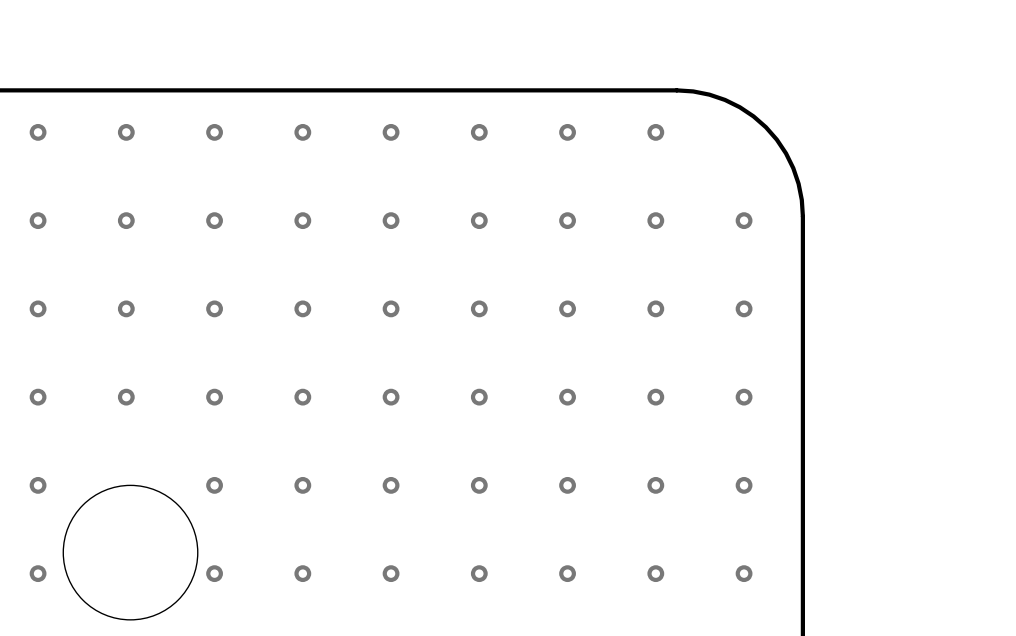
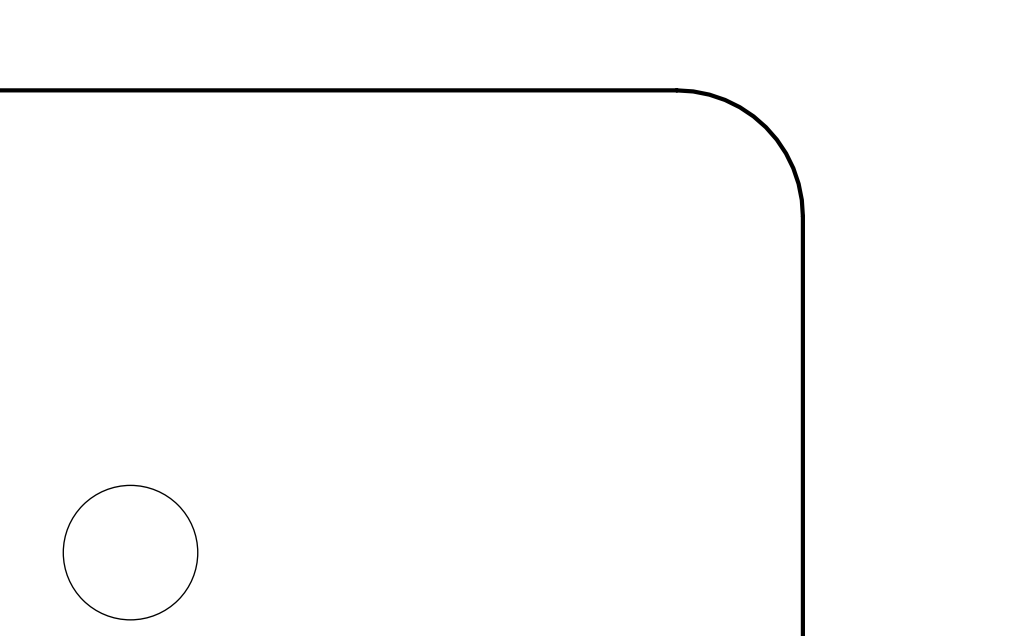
via: (38, 132) -> none
via: (126, 132) -> none
via: (214, 132) -> none
via: (302, 132) -> none
via: (391, 132) -> none
via: (479, 132) -> none
via: (567, 132) -> none
via: (655, 132) -> none
via: (38, 220) -> none
via: (126, 220) -> none
via: (214, 220) -> none
via: (302, 220) -> none
via: (391, 220) -> none
via: (479, 220) -> none
via: (567, 220) -> none
via: (655, 220) -> none
via: (744, 220) -> none
via: (38, 308) -> none
via: (126, 308) -> none
via: (214, 308) -> none
via: (302, 308) -> none
via: (391, 308) -> none
via: (479, 308) -> none
via: (567, 308) -> none
via: (655, 308) -> none
via: (744, 308) -> none
via: (38, 397) -> none
via: (126, 397) -> none
via: (214, 397) -> none
via: (302, 397) -> none
via: (391, 397) -> none
via: (479, 397) -> none
via: (567, 397) -> none
via: (655, 397) -> none
via: (744, 397) -> none
via: (38, 485) -> none
via: (214, 485) -> none
via: (302, 485) -> none
via: (391, 485) -> none
via: (479, 485) -> none
via: (567, 485) -> none
via: (655, 485) -> none
via: (744, 485) -> none
via: (38, 573) -> none
via: (214, 573) -> none
via: (302, 573) -> none
via: (391, 573) -> none
via: (479, 573) -> none
via: (567, 573) -> none
via: (655, 573) -> none
via: (744, 573) -> none

